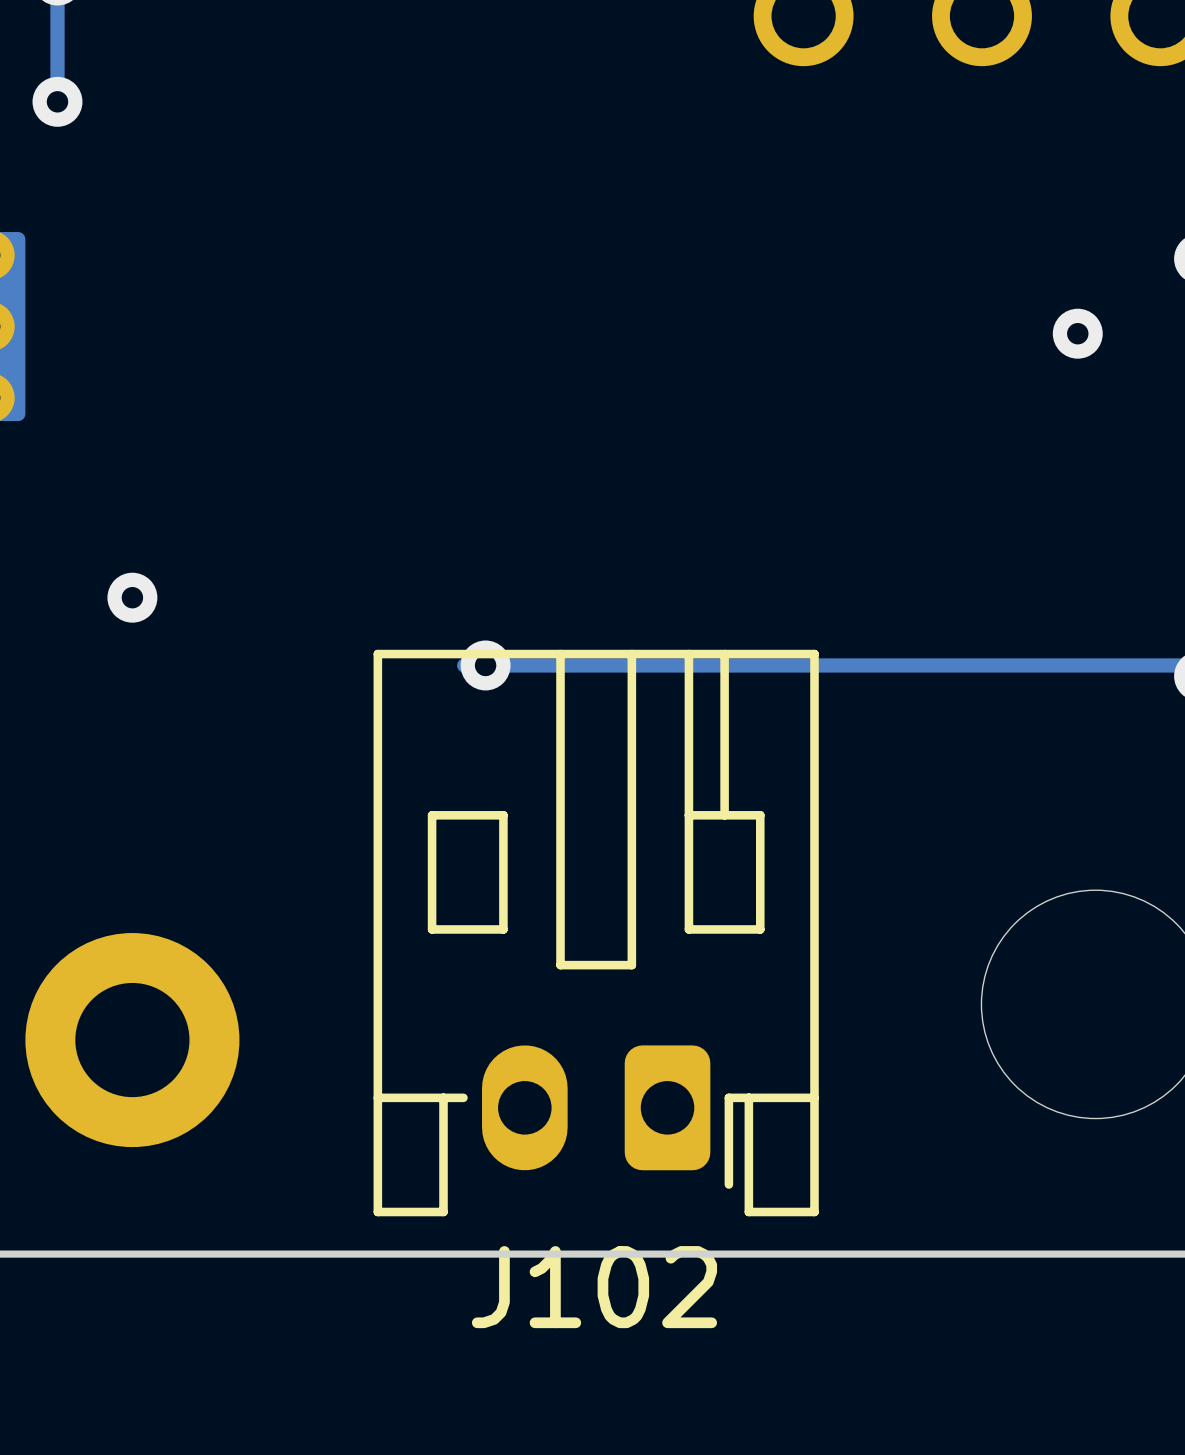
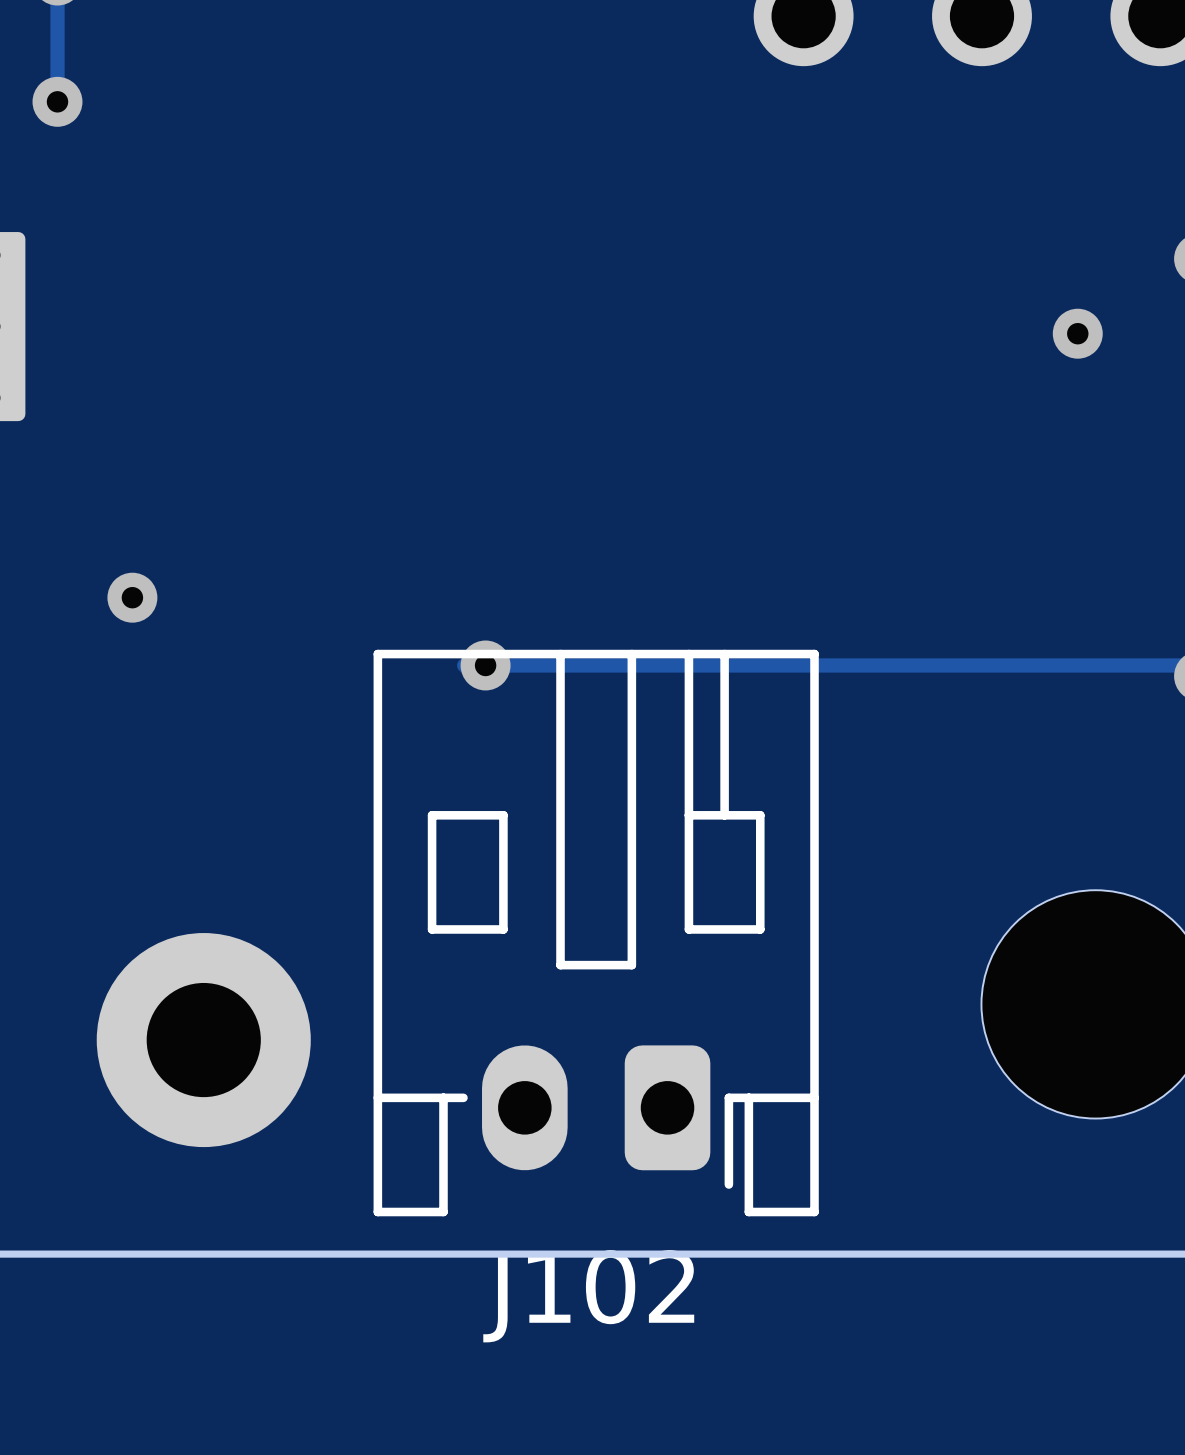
part position: (132, 1040) -> (203, 1040)

